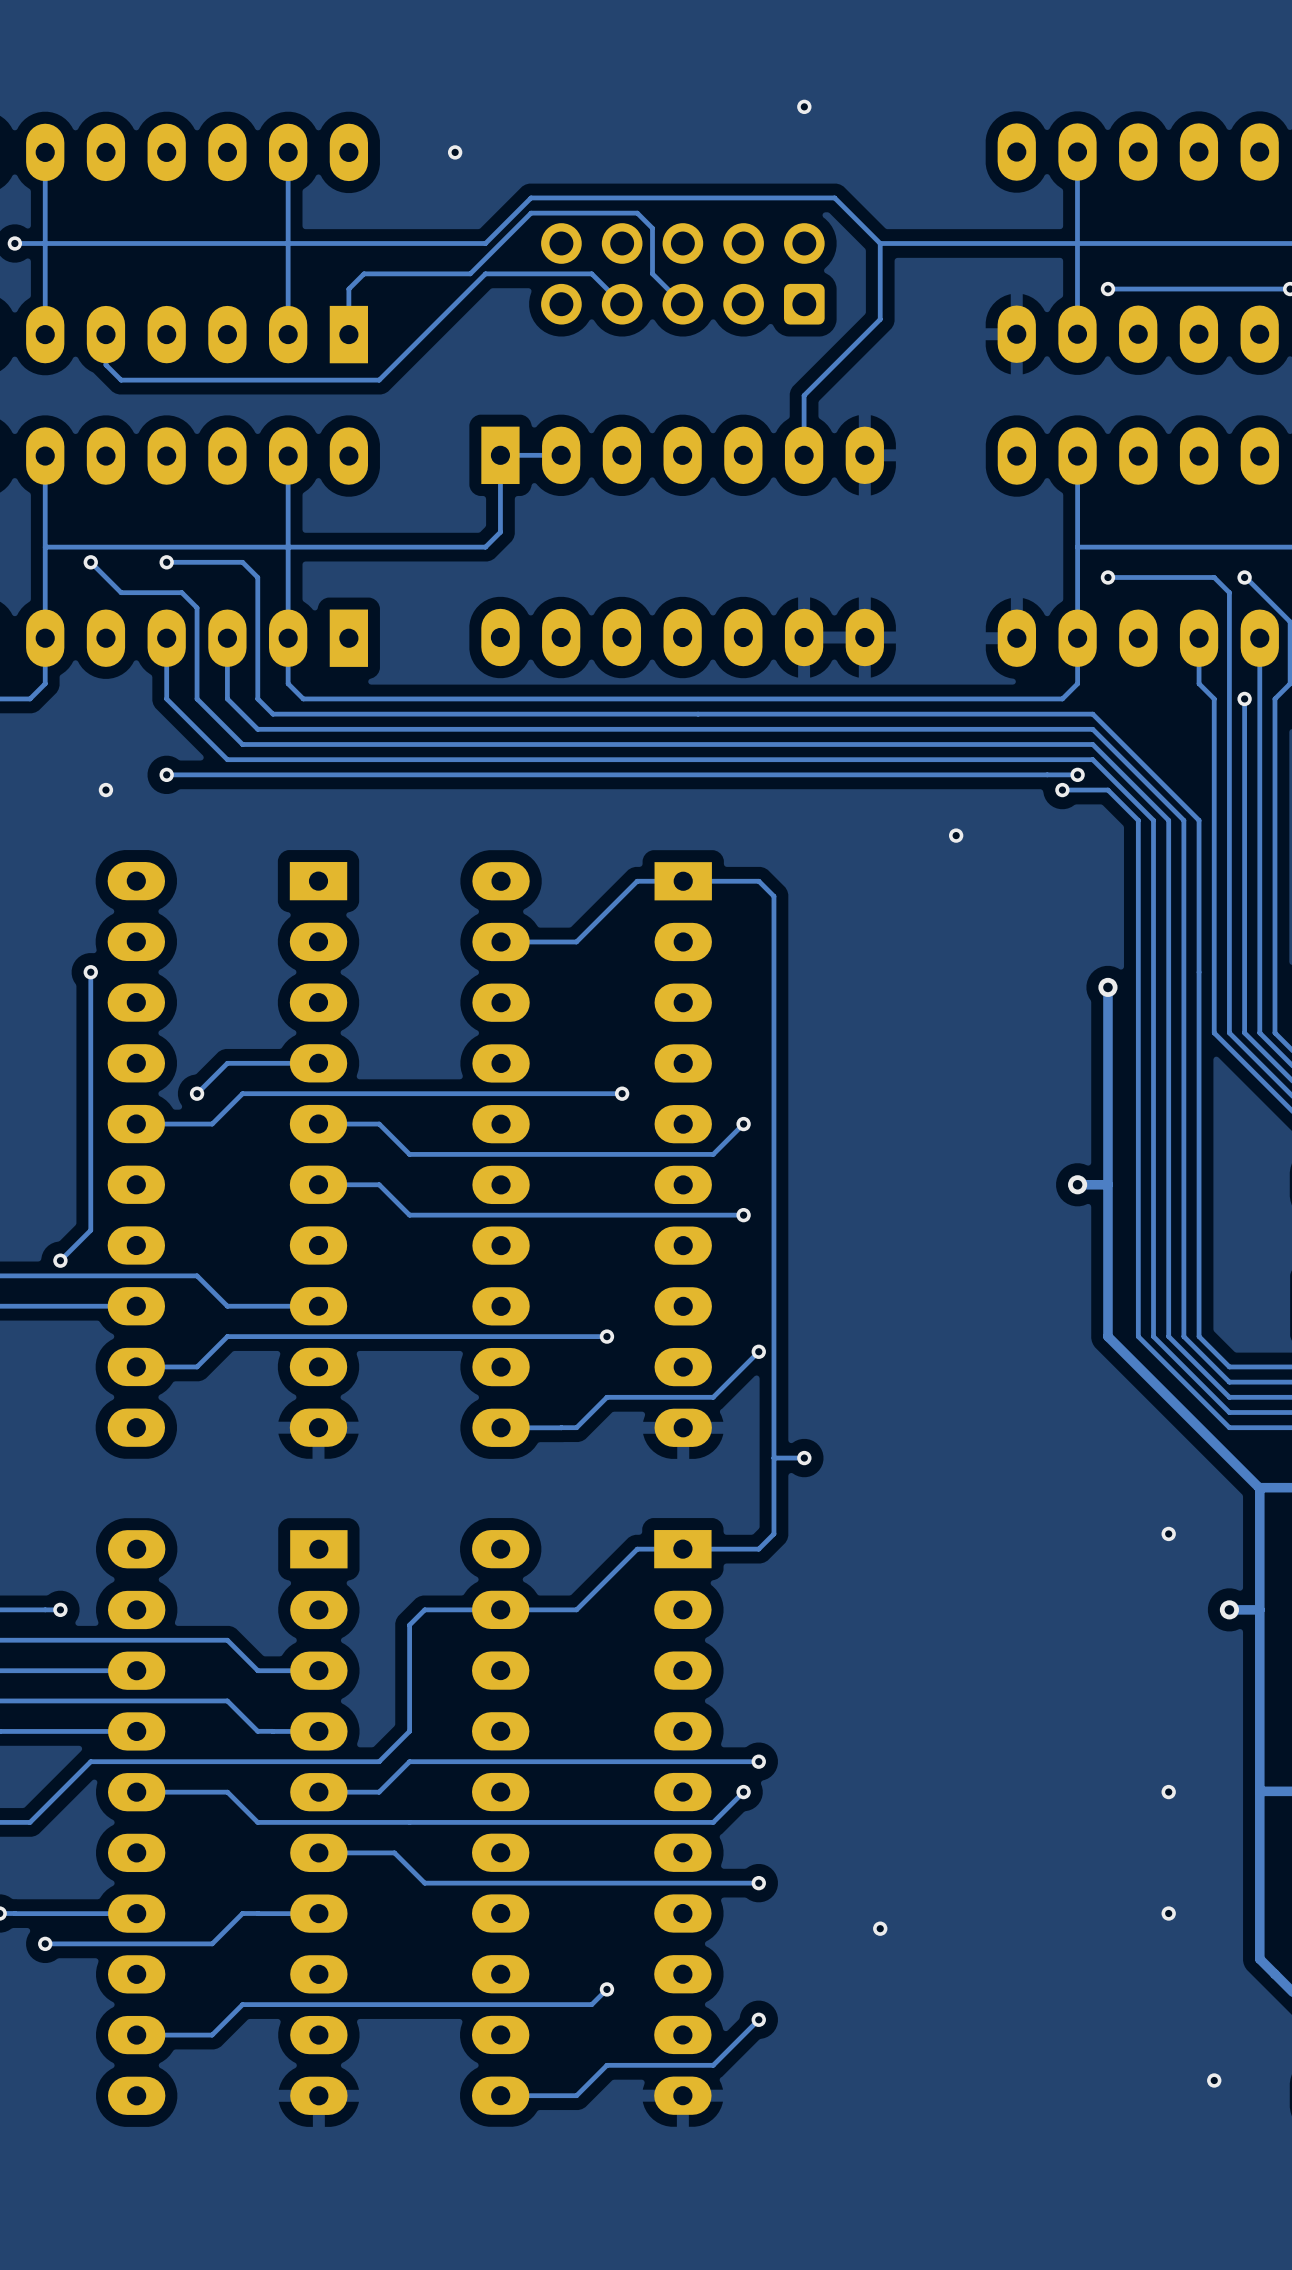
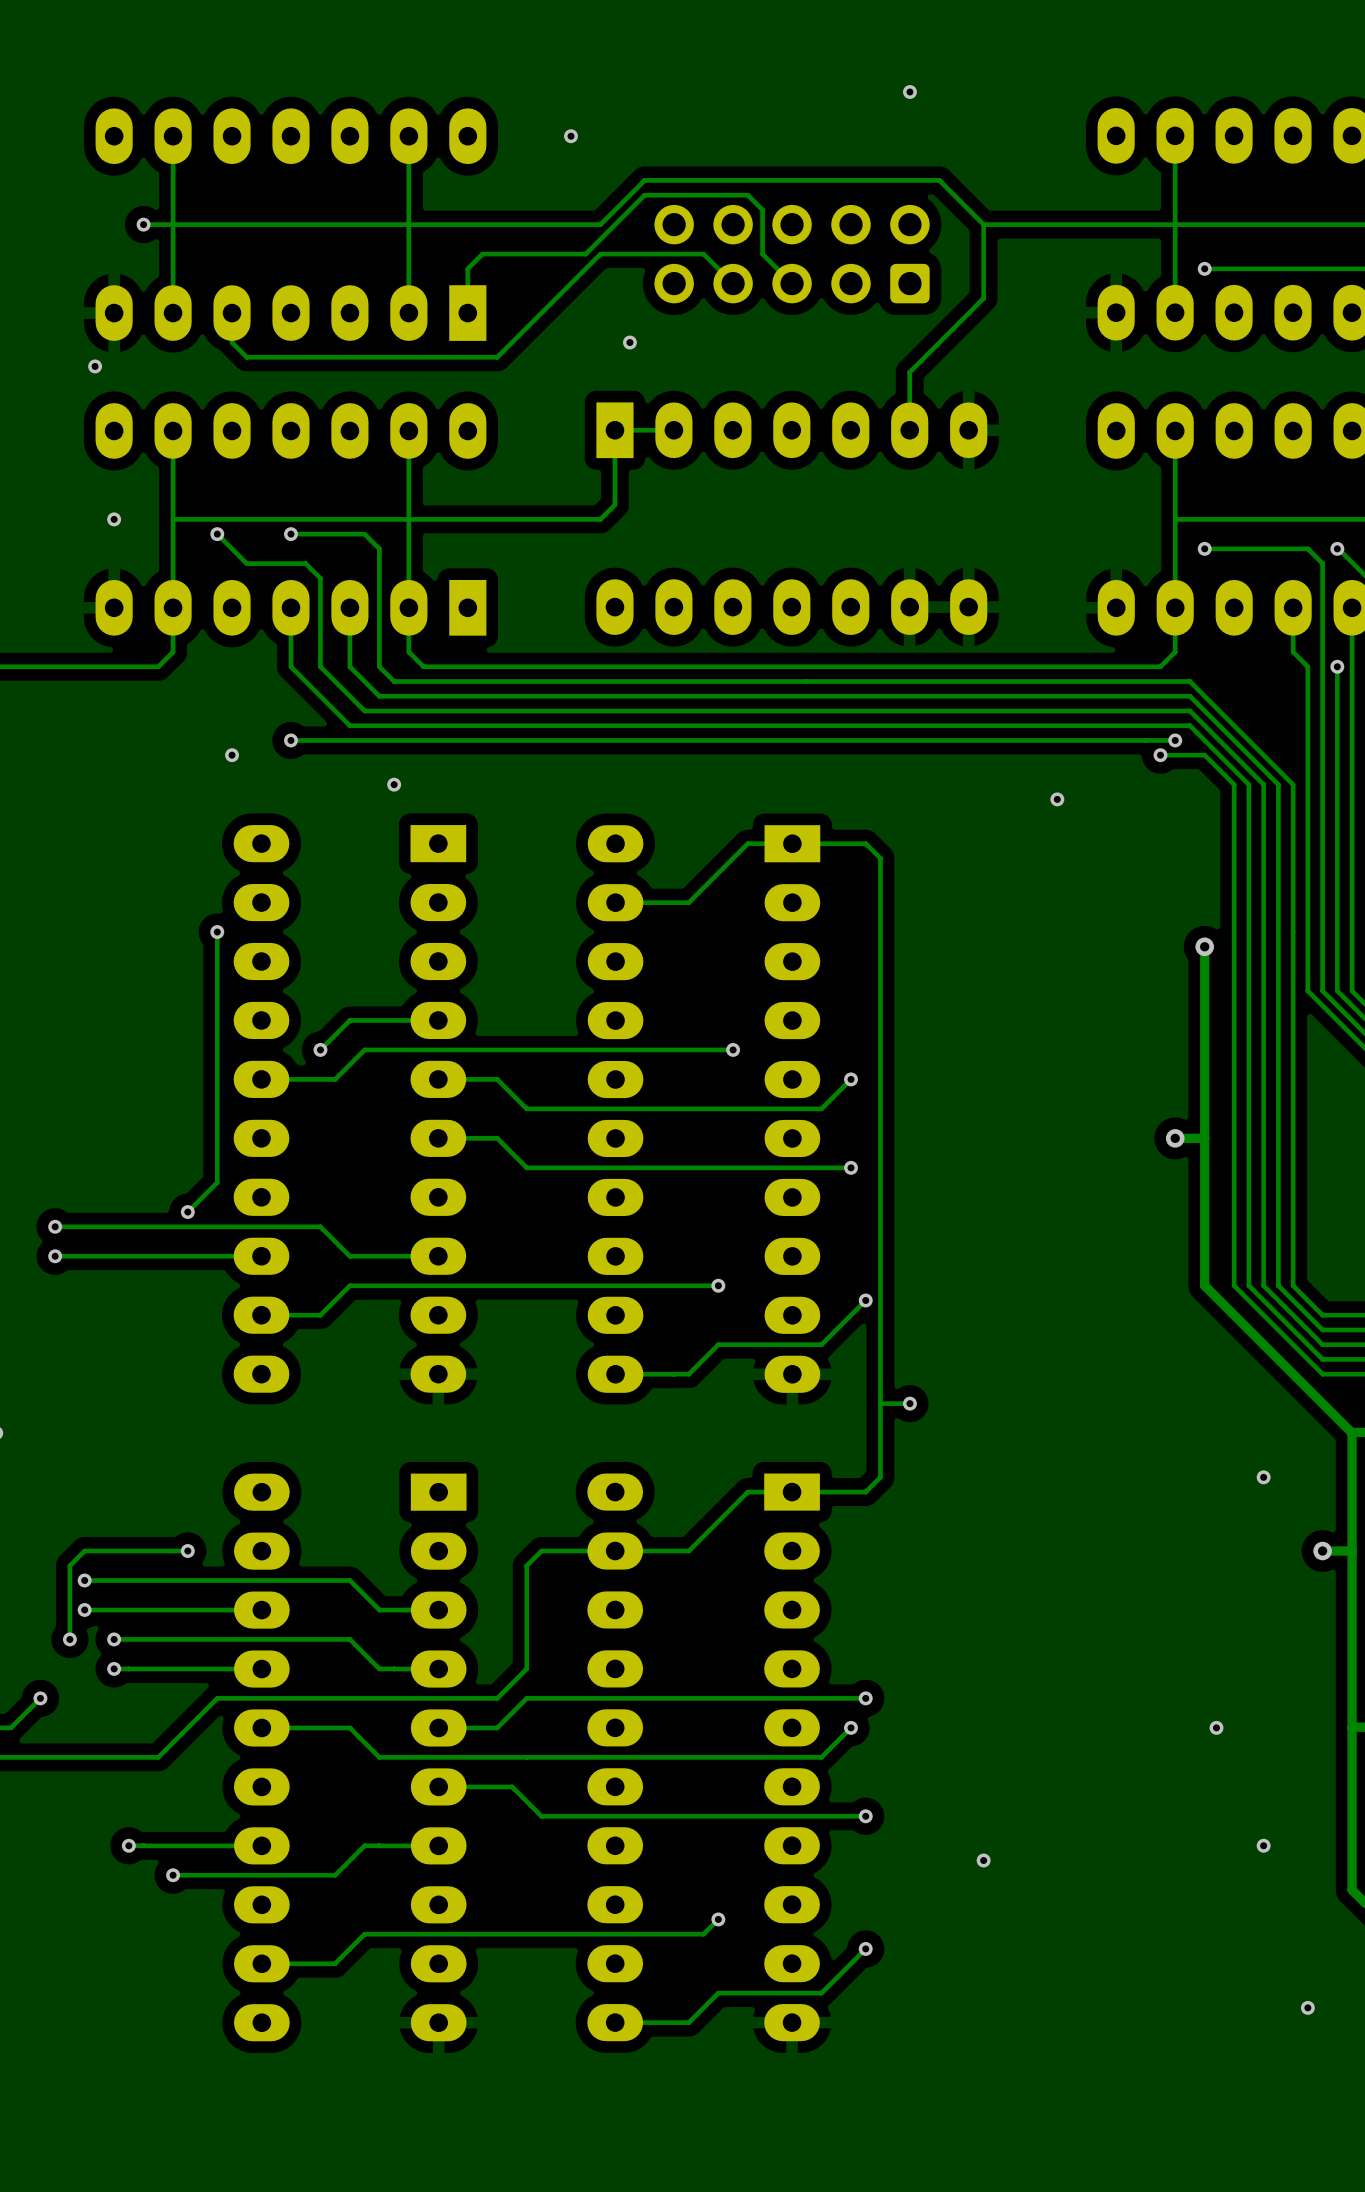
via: none -> (629, 342)
via: none -> (394, 784)
via position: (1168, 1792) -> (1216, 1727)

